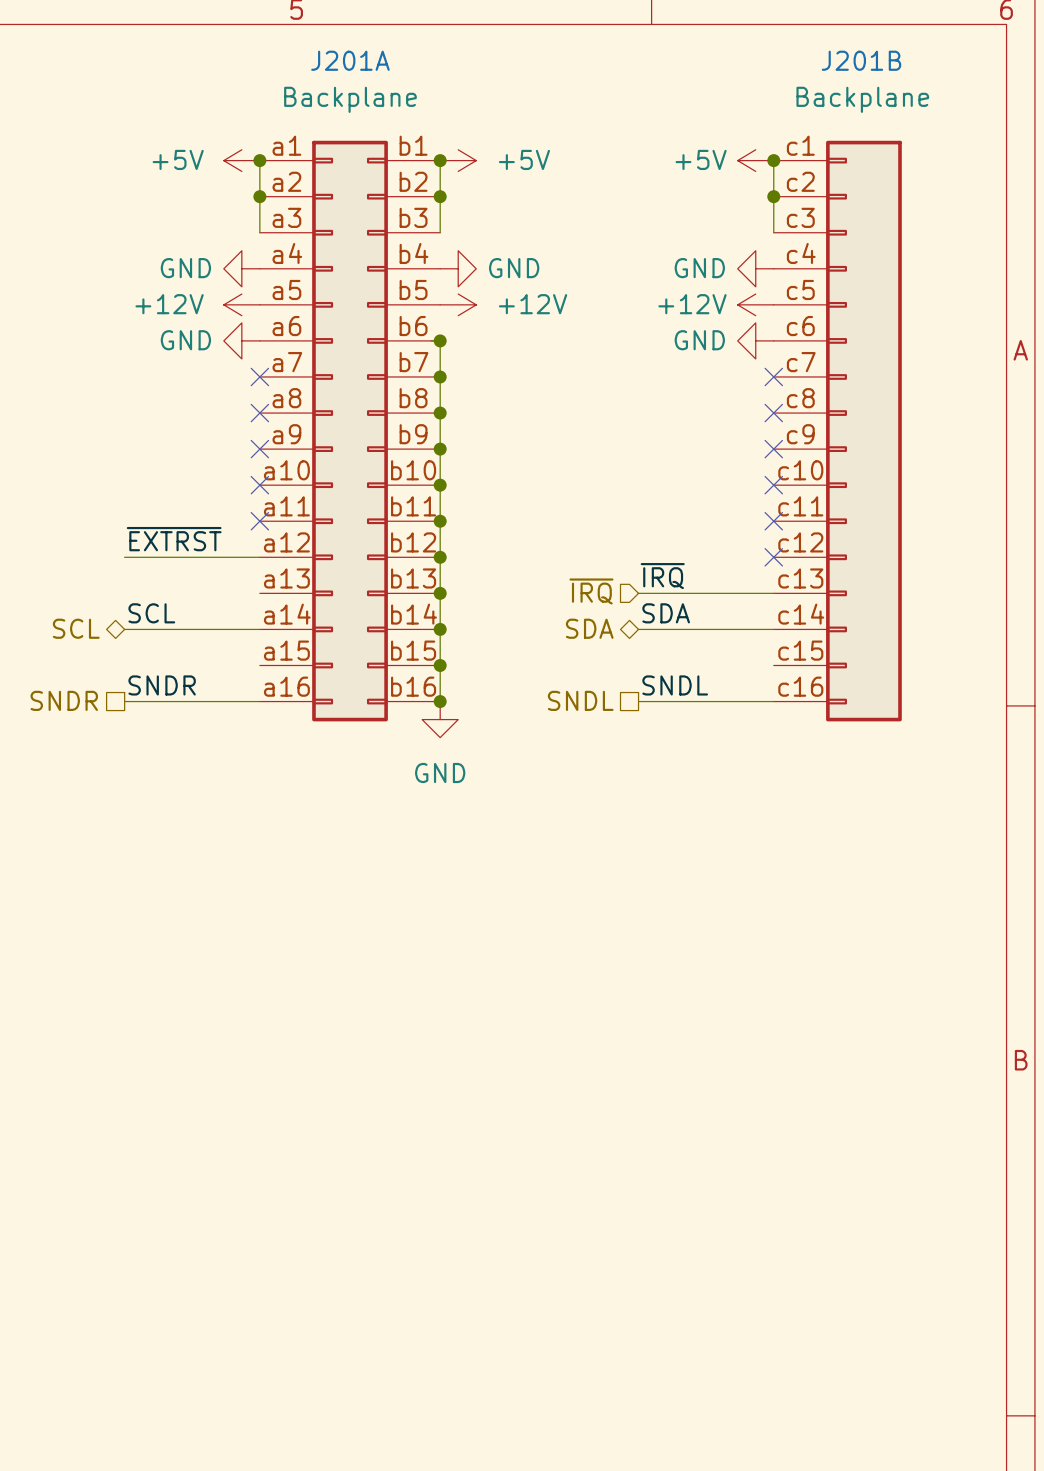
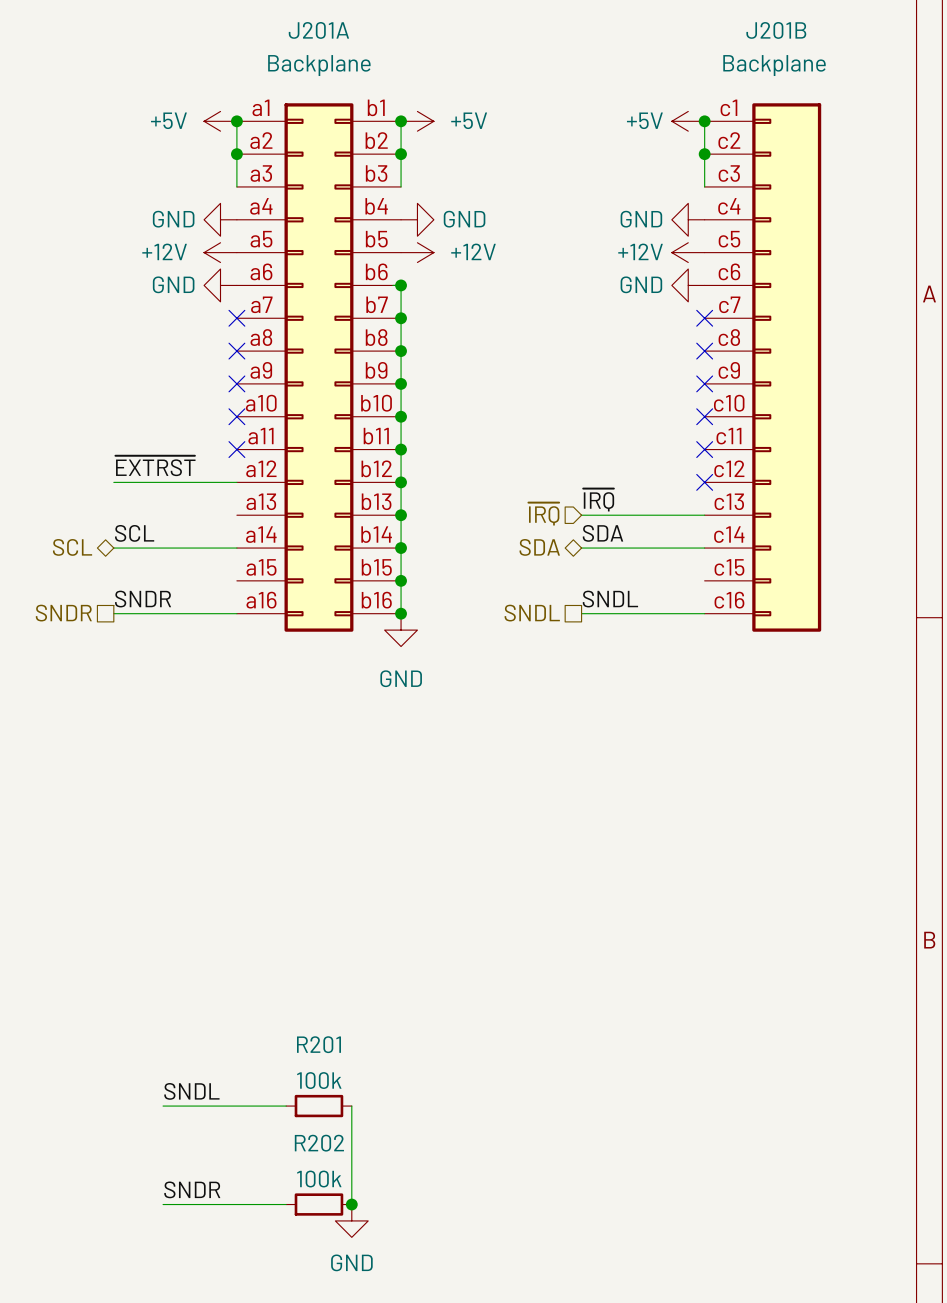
label: none -> SNDL (191, 1091)
wire: none -> (163, 1106) (286, 1106)
R201: none -> 100k (318, 1106)
wire: none -> (351, 1106) (351, 1204)
label: none -> SNDR (192, 1189)
wire: none -> (163, 1204) (286, 1204)
R202: none -> 100k (318, 1204)
junction: none -> (351, 1204)
power symbol: none -> GND (351, 1220)

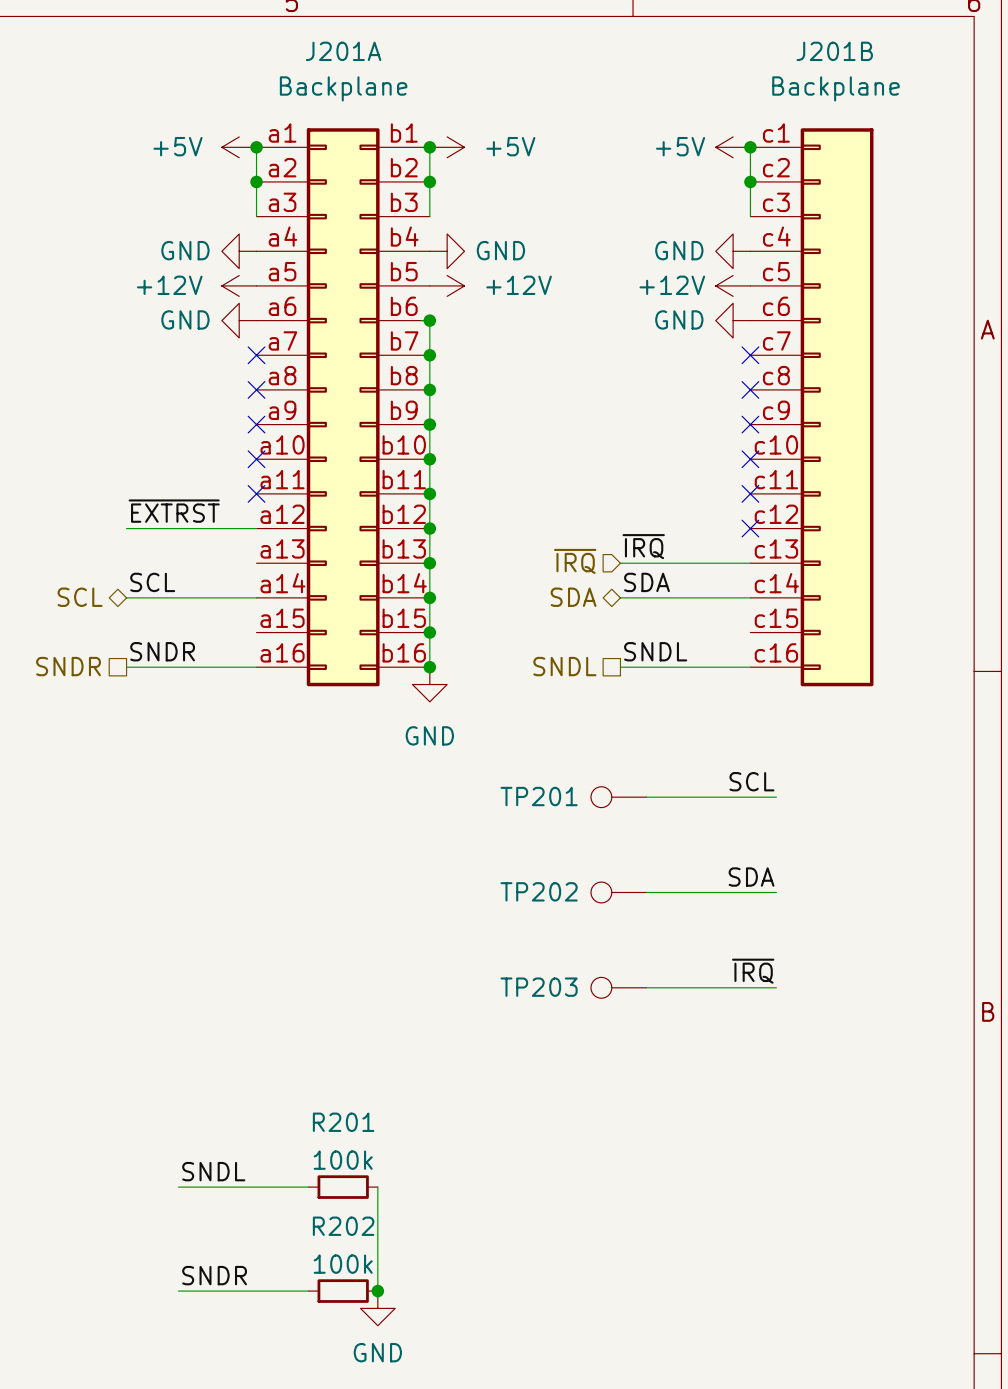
label: none -> SCL (751, 781)
TP201: none -> (618, 797)
wire: none -> (646, 797) (776, 797)
label: none -> SDA (751, 877)
TP202: none -> (618, 892)
wire: none -> (646, 892) (776, 892)
label: none -> ~{IRQ} (753, 971)
TP203: none -> (618, 987)
wire: none -> (646, 987) (776, 987)

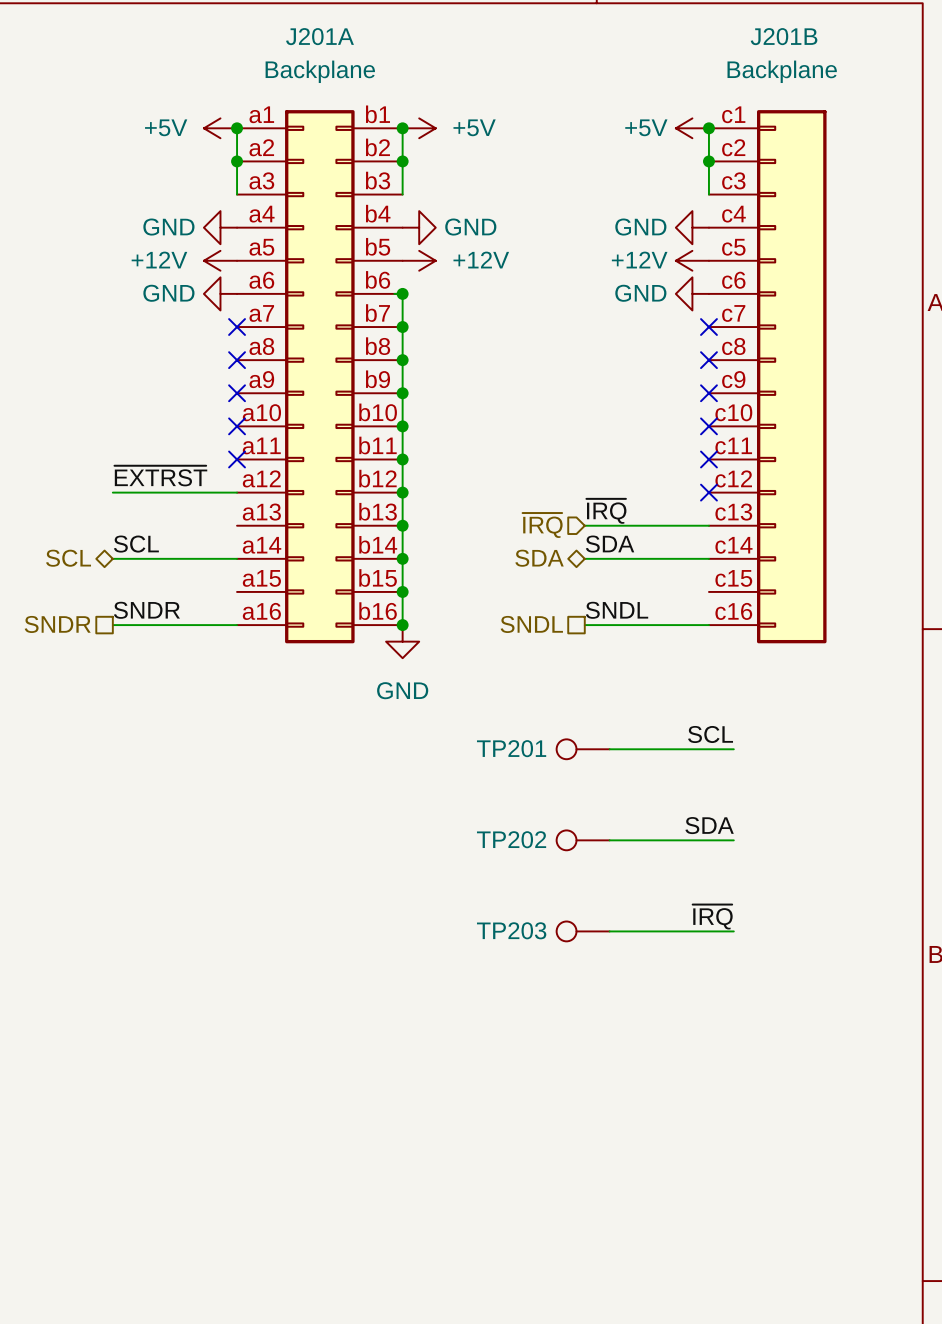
label: SNDL (213, 1171) -> none
wire: (178, 1187) (308, 1187) -> none
R201: 100k (343, 1187) -> none
wire: (377, 1187) (377, 1291) -> none
label: SNDR (214, 1275) -> none
wire: (178, 1291) (308, 1291) -> none
R202: 100k (343, 1291) -> none
junction: (377, 1291) -> none
power symbol: GND (377, 1308) -> none

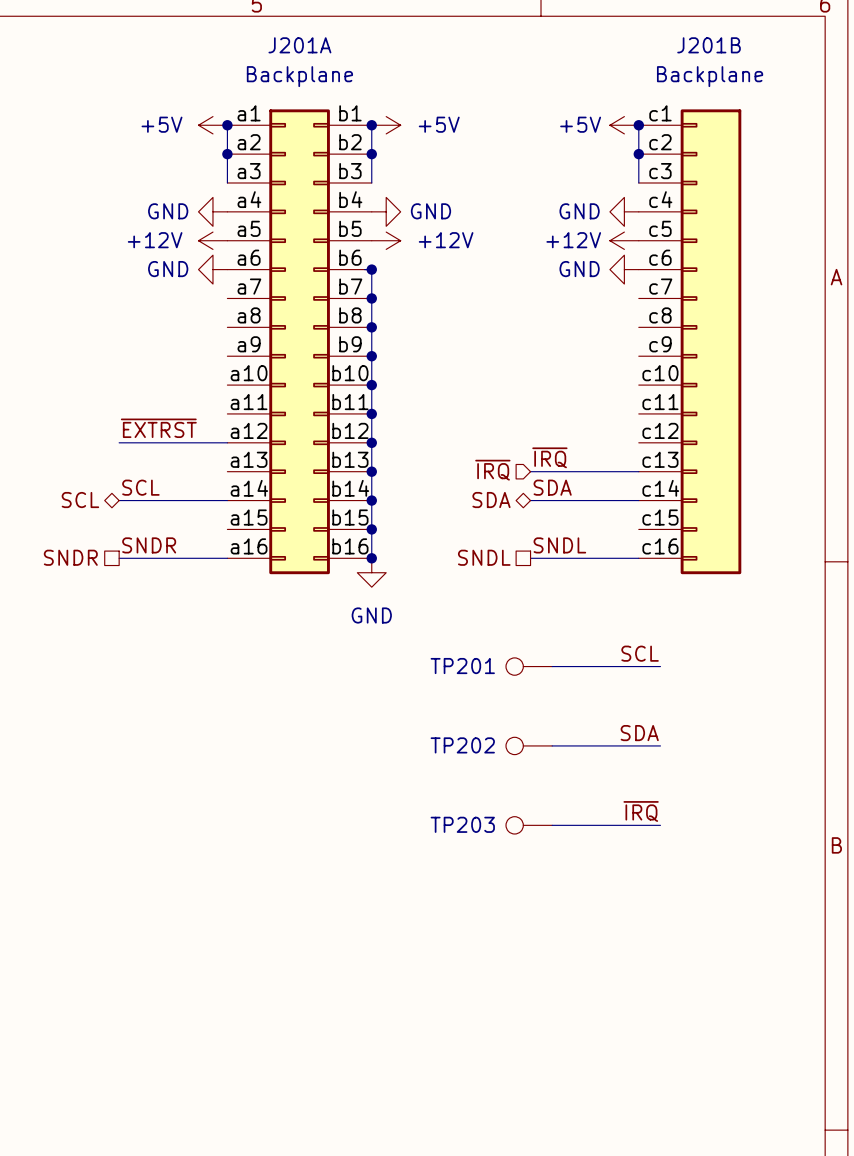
no-connect mark: (237, 327) -> none
no-connect mark: (708, 327) -> none
no-connect mark: (237, 360) -> none
no-connect mark: (708, 360) -> none
no-connect mark: (237, 393) -> none
no-connect mark: (708, 393) -> none
no-connect mark: (237, 426) -> none
no-connect mark: (708, 426) -> none
no-connect mark: (237, 459) -> none
no-connect mark: (708, 459) -> none
no-connect mark: (708, 492) -> none

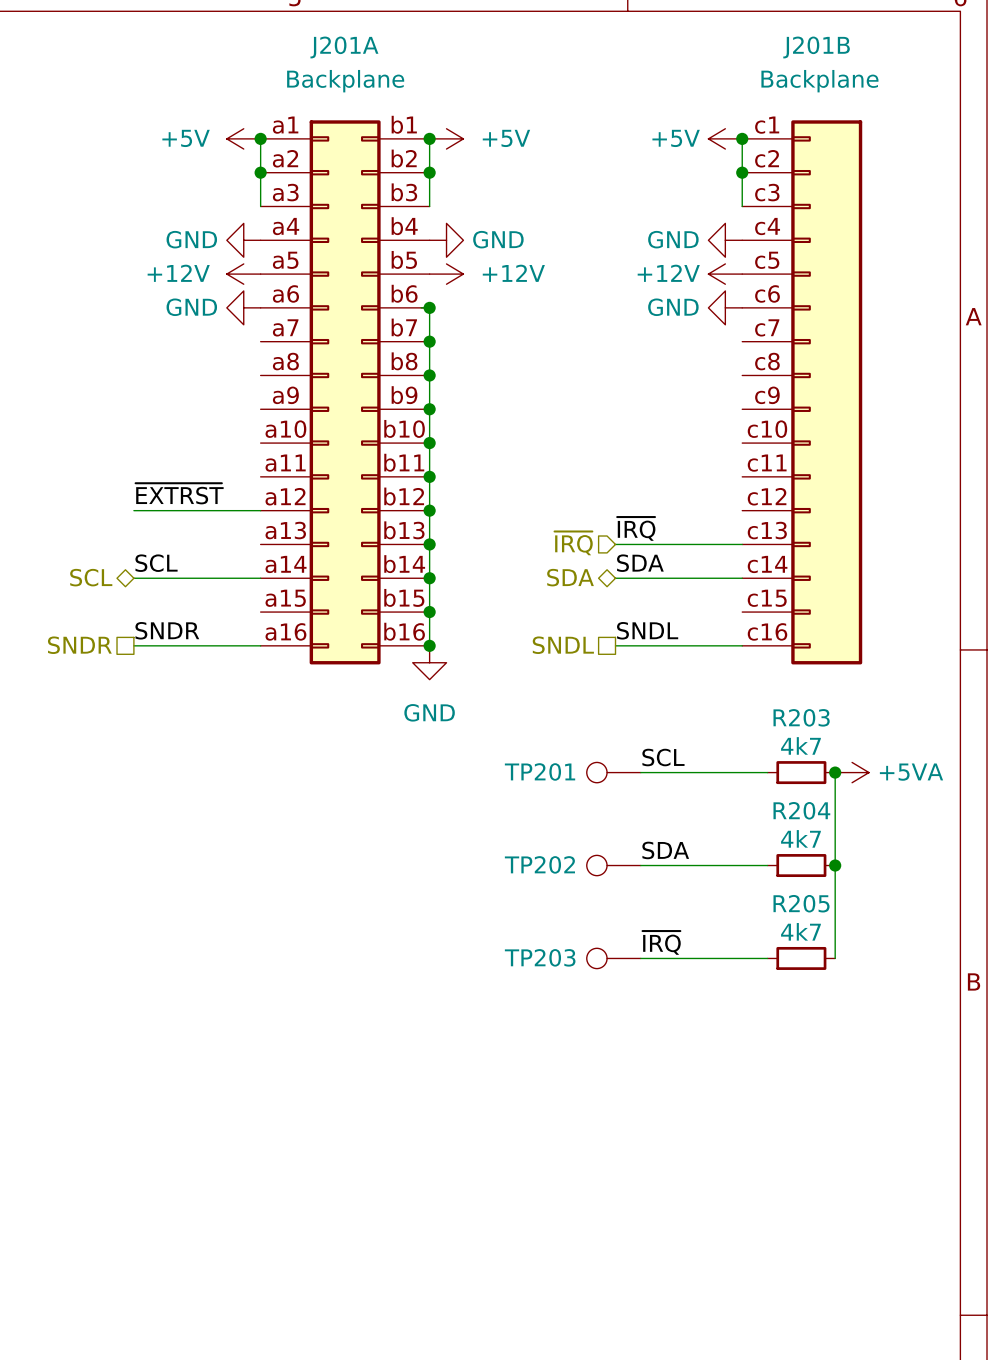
label position: SCL (640, 653) -> SCL (663, 757)
R203: none -> 4k7 (801, 772)
wire: none -> (835, 772) (835, 958)
junction: none -> (835, 772)
power symbol: none -> +5VA (852, 772)
label position: SDA (639, 733) -> SDA (665, 850)
R204: none -> 4k7 (801, 865)
junction: none -> (835, 865)
label position: ~{IRQ} (641, 811) -> ~{IRQ} (661, 942)
R205: none -> 4k7 (801, 958)

